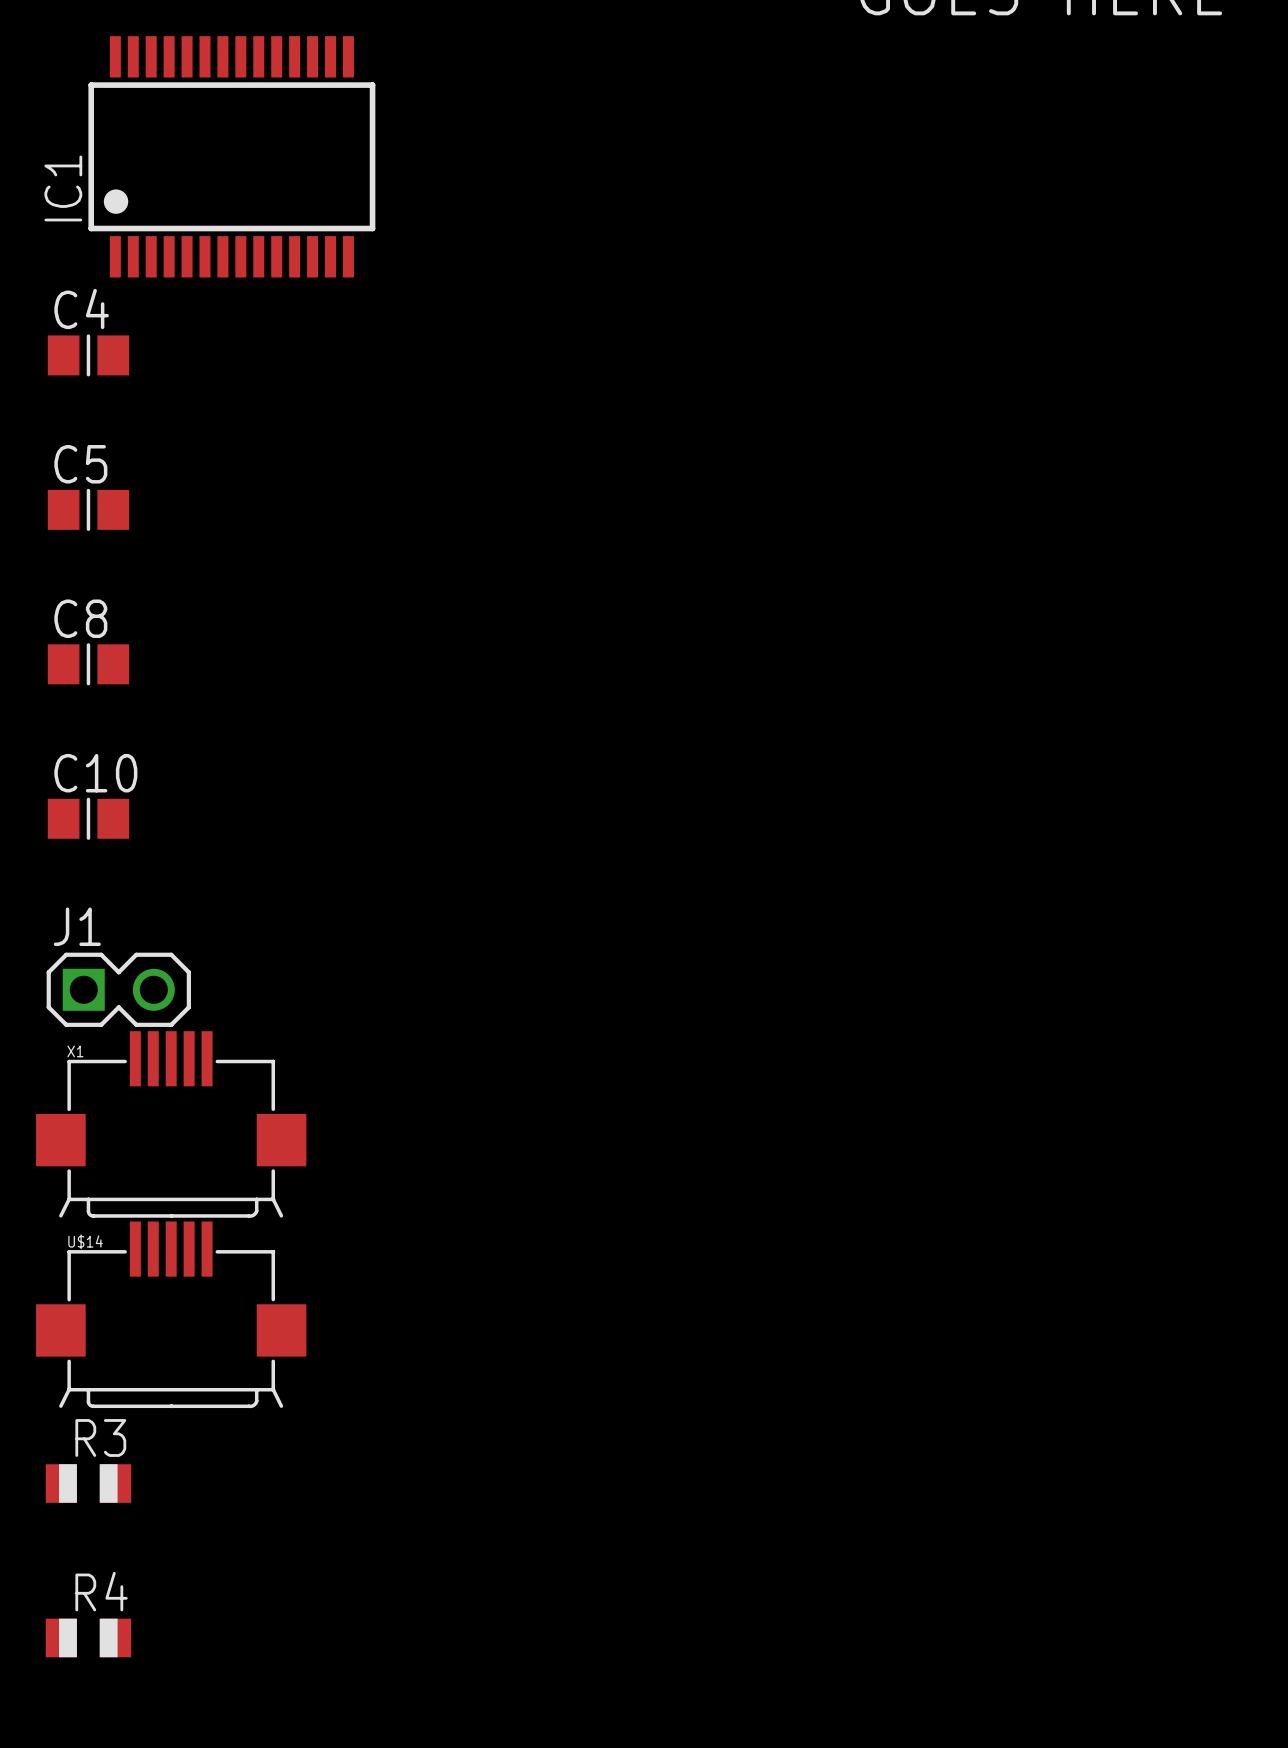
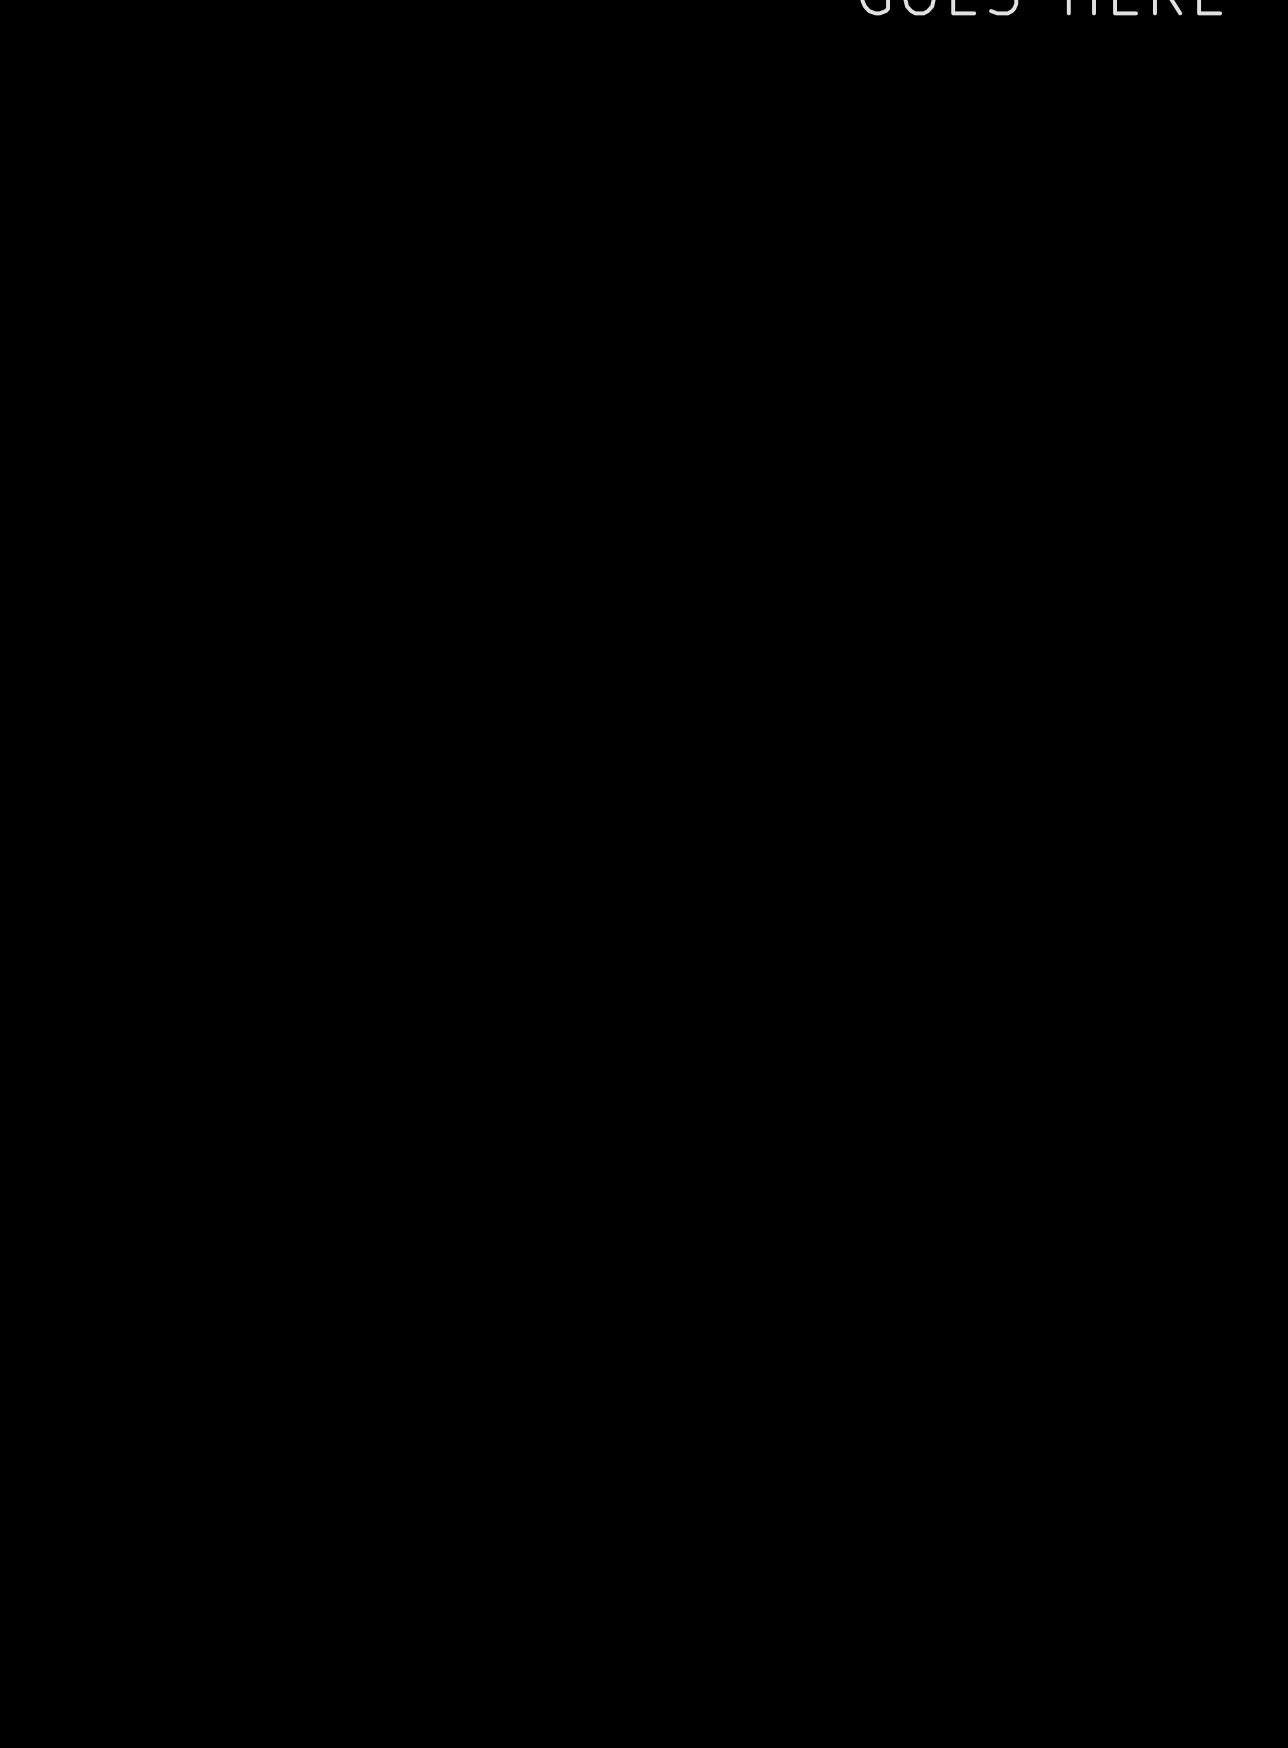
IC1: (231, 156) -> none
C4: (88, 355) -> none
C5: (88, 509) -> none
C8: (88, 664) -> none
C10: (88, 818) -> none
J1: (118, 989) -> none
X1: (171, 1124) -> none
U$14: (171, 1314) -> none
R3: (88, 1483) -> none
R4: (88, 1637) -> none

